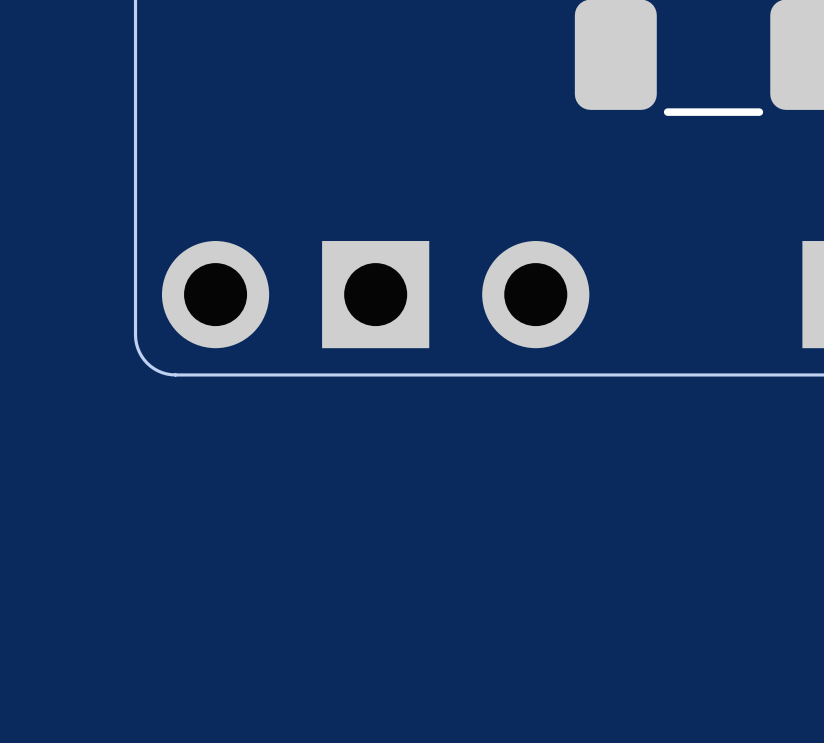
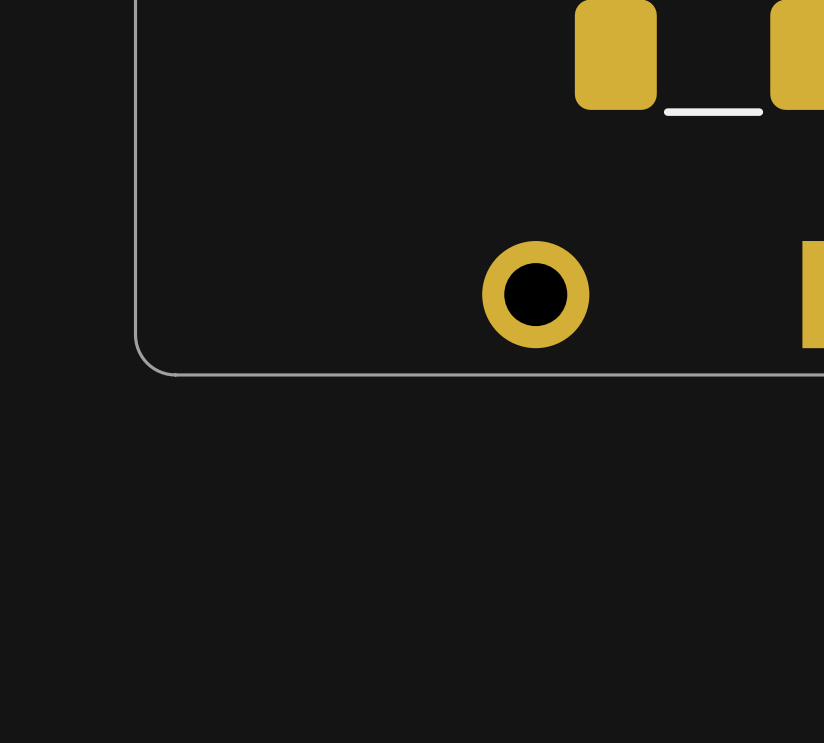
part: (295, 294) -> none

